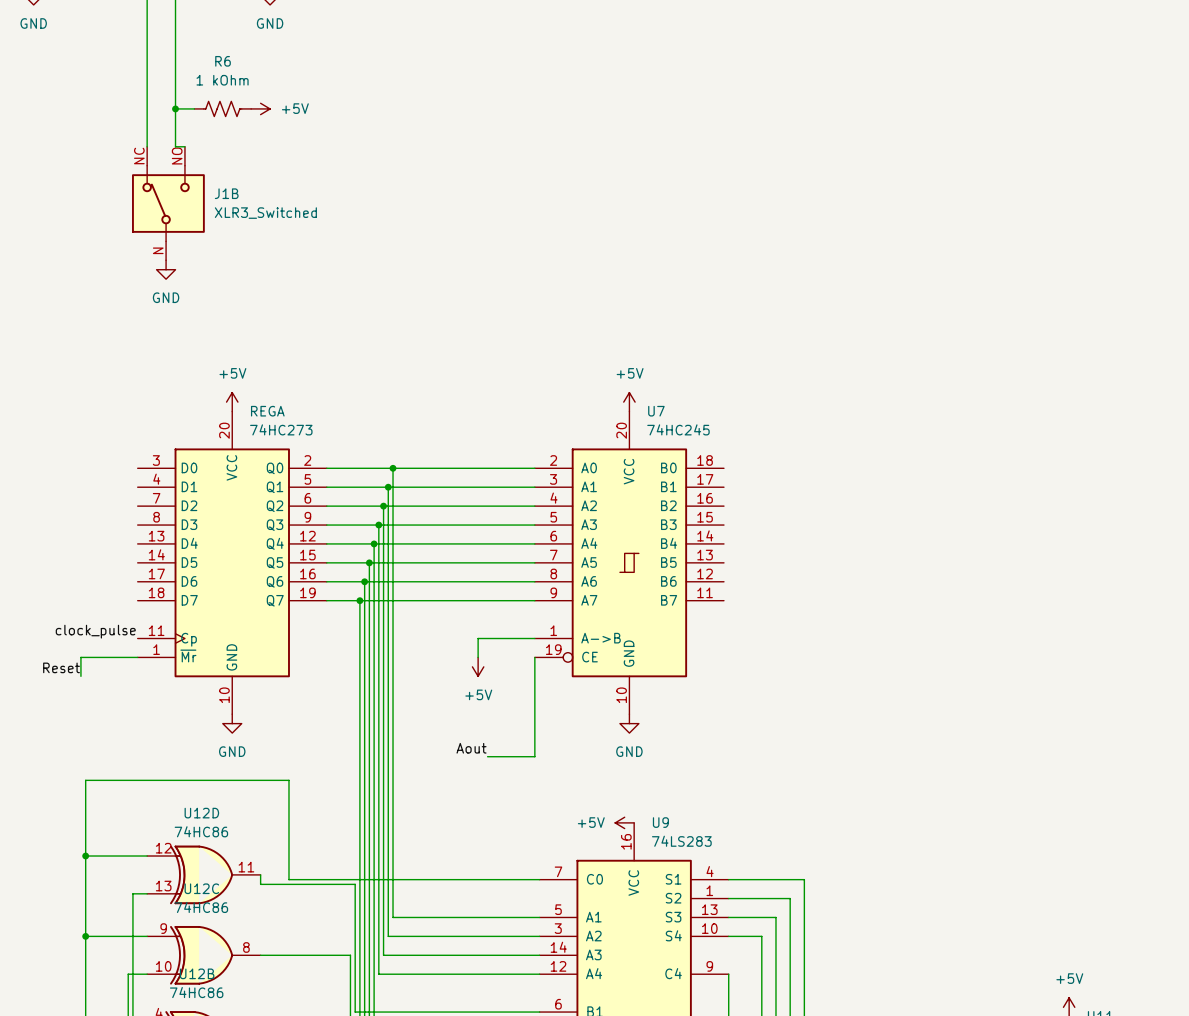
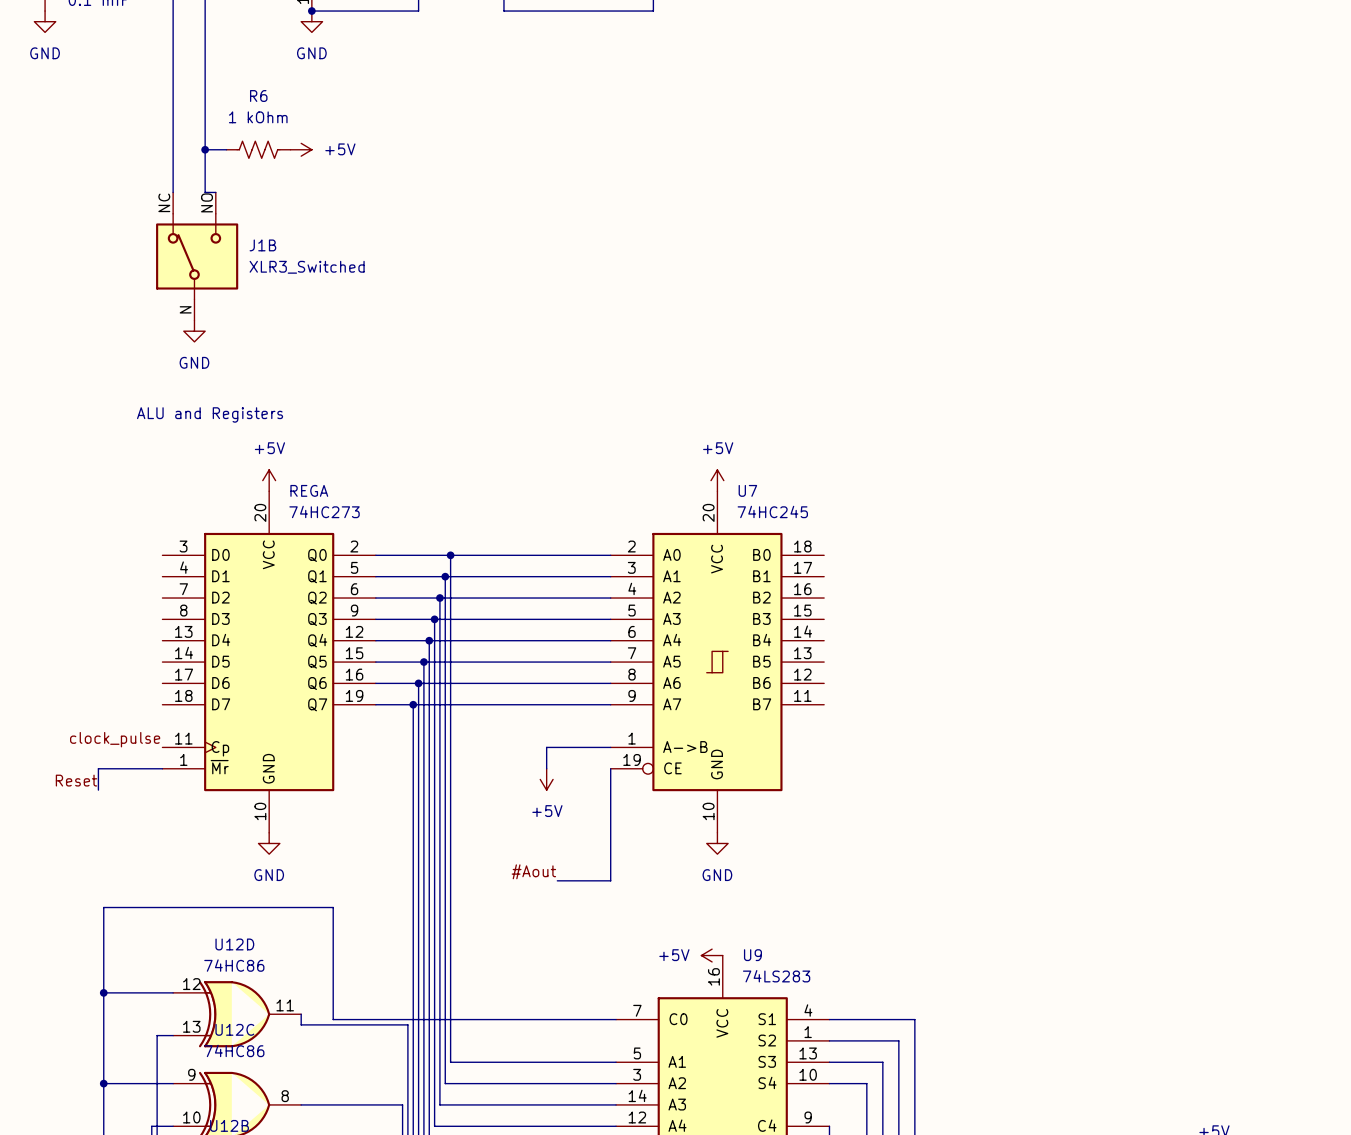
text: none -> ALU and Registers (210, 414)
label: Aout (471, 748) -> #Aout (533, 871)

